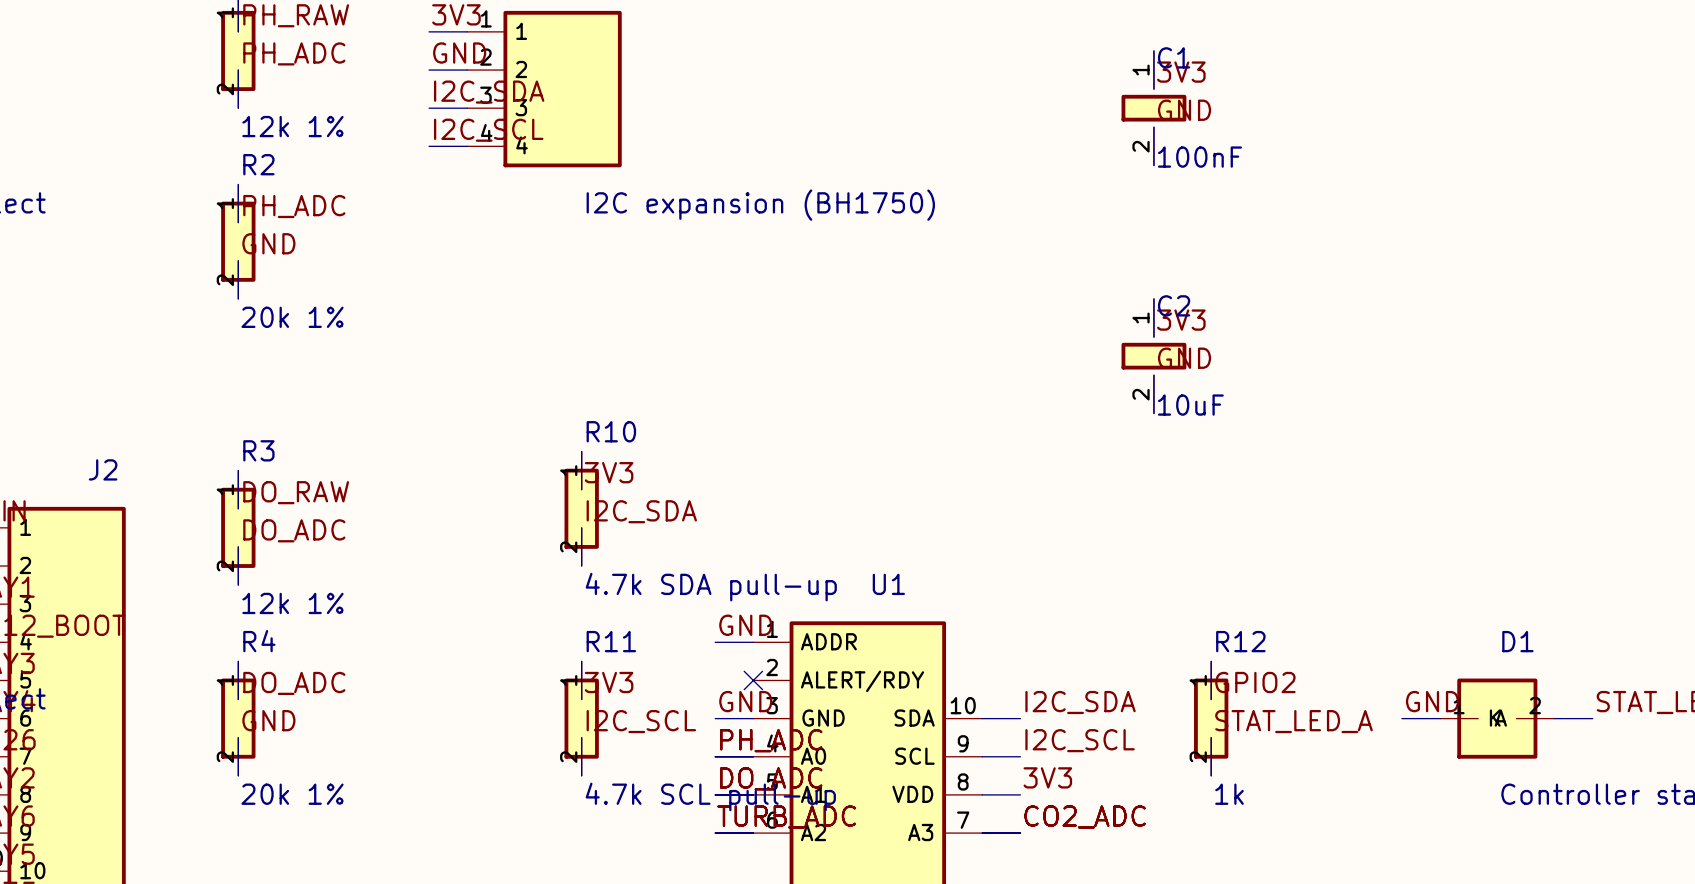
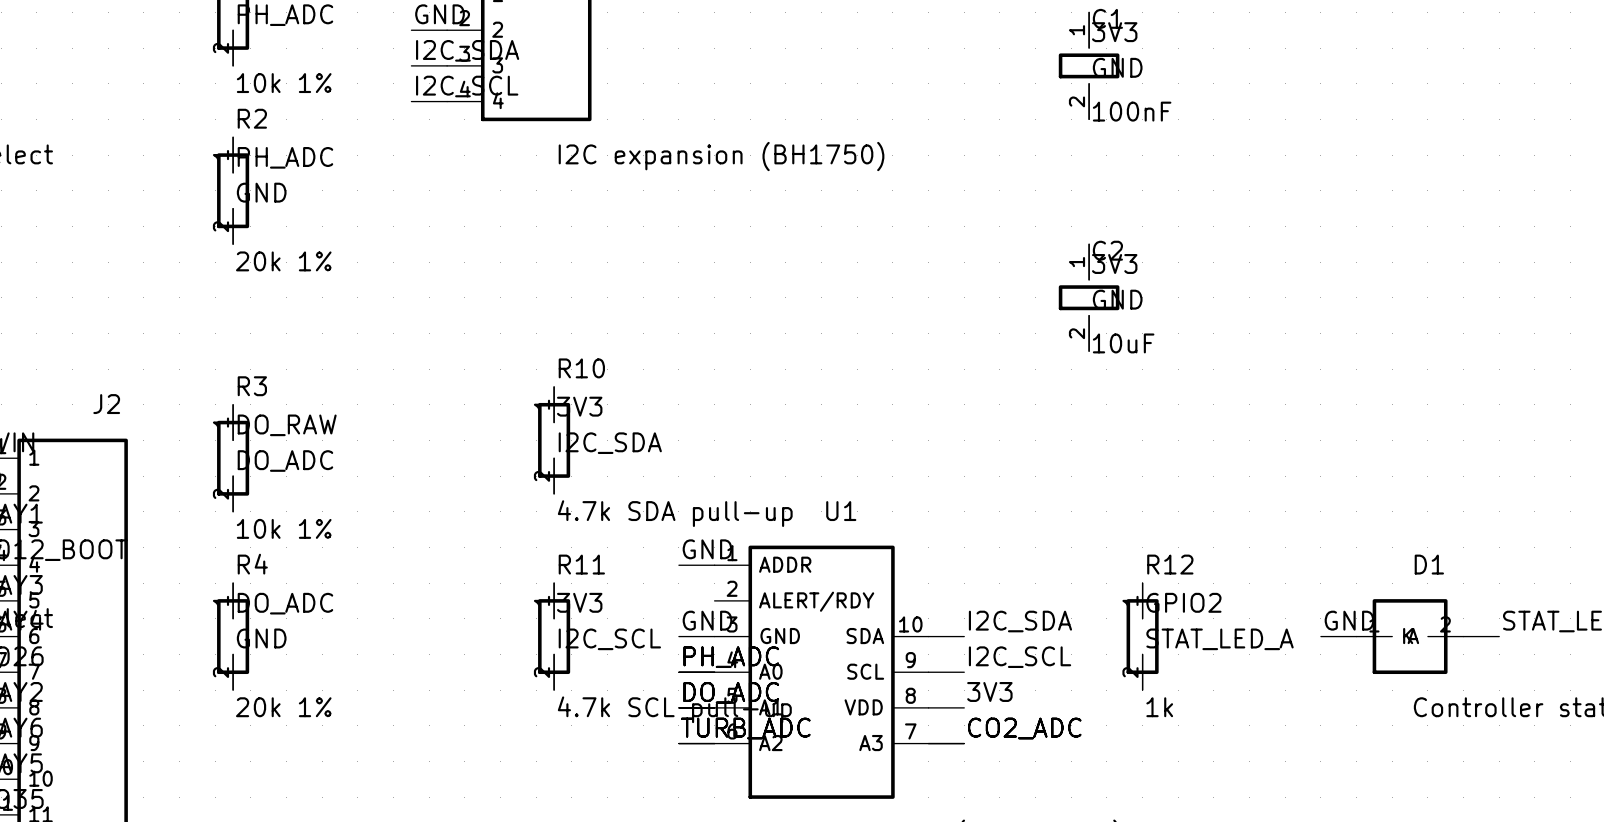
part value: 12k 1% (292, 126) -> 10k 1% (284, 83)
R3 value: 12k 1% (292, 603) -> 10k 1% (284, 528)
no-connect mark: (753, 680) -> none

